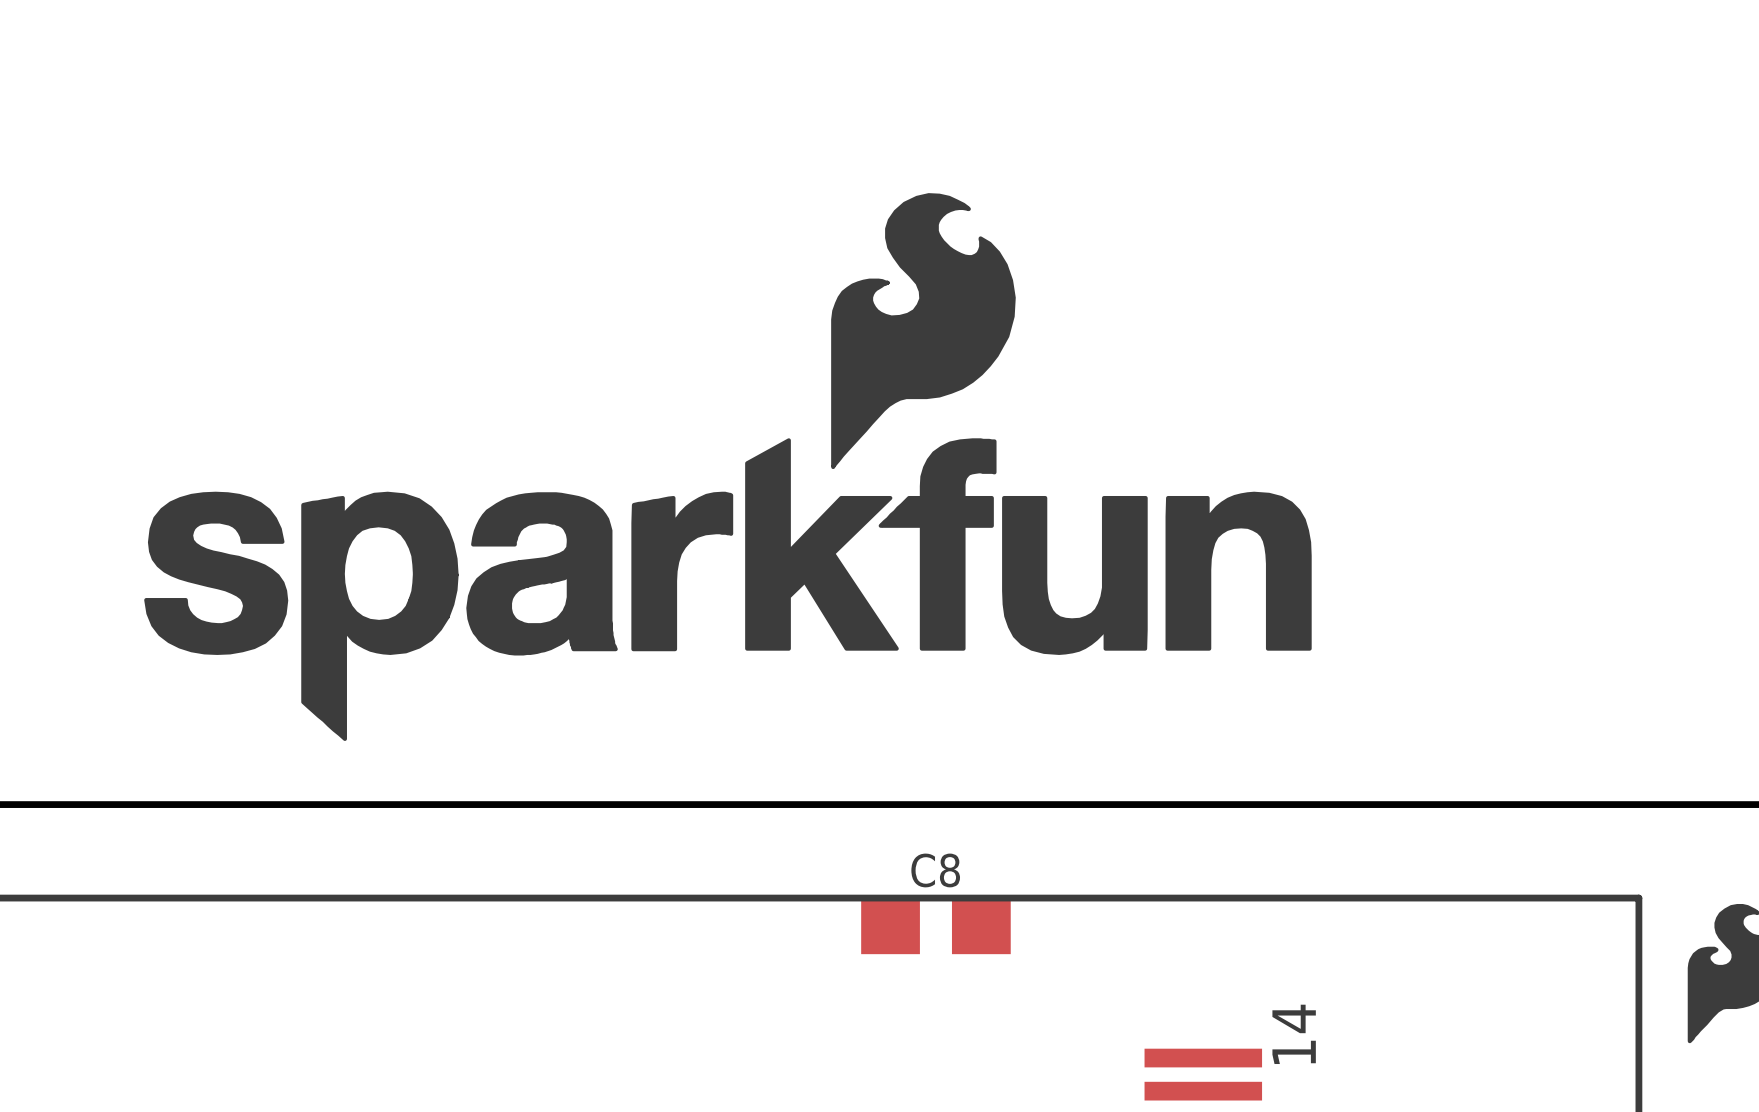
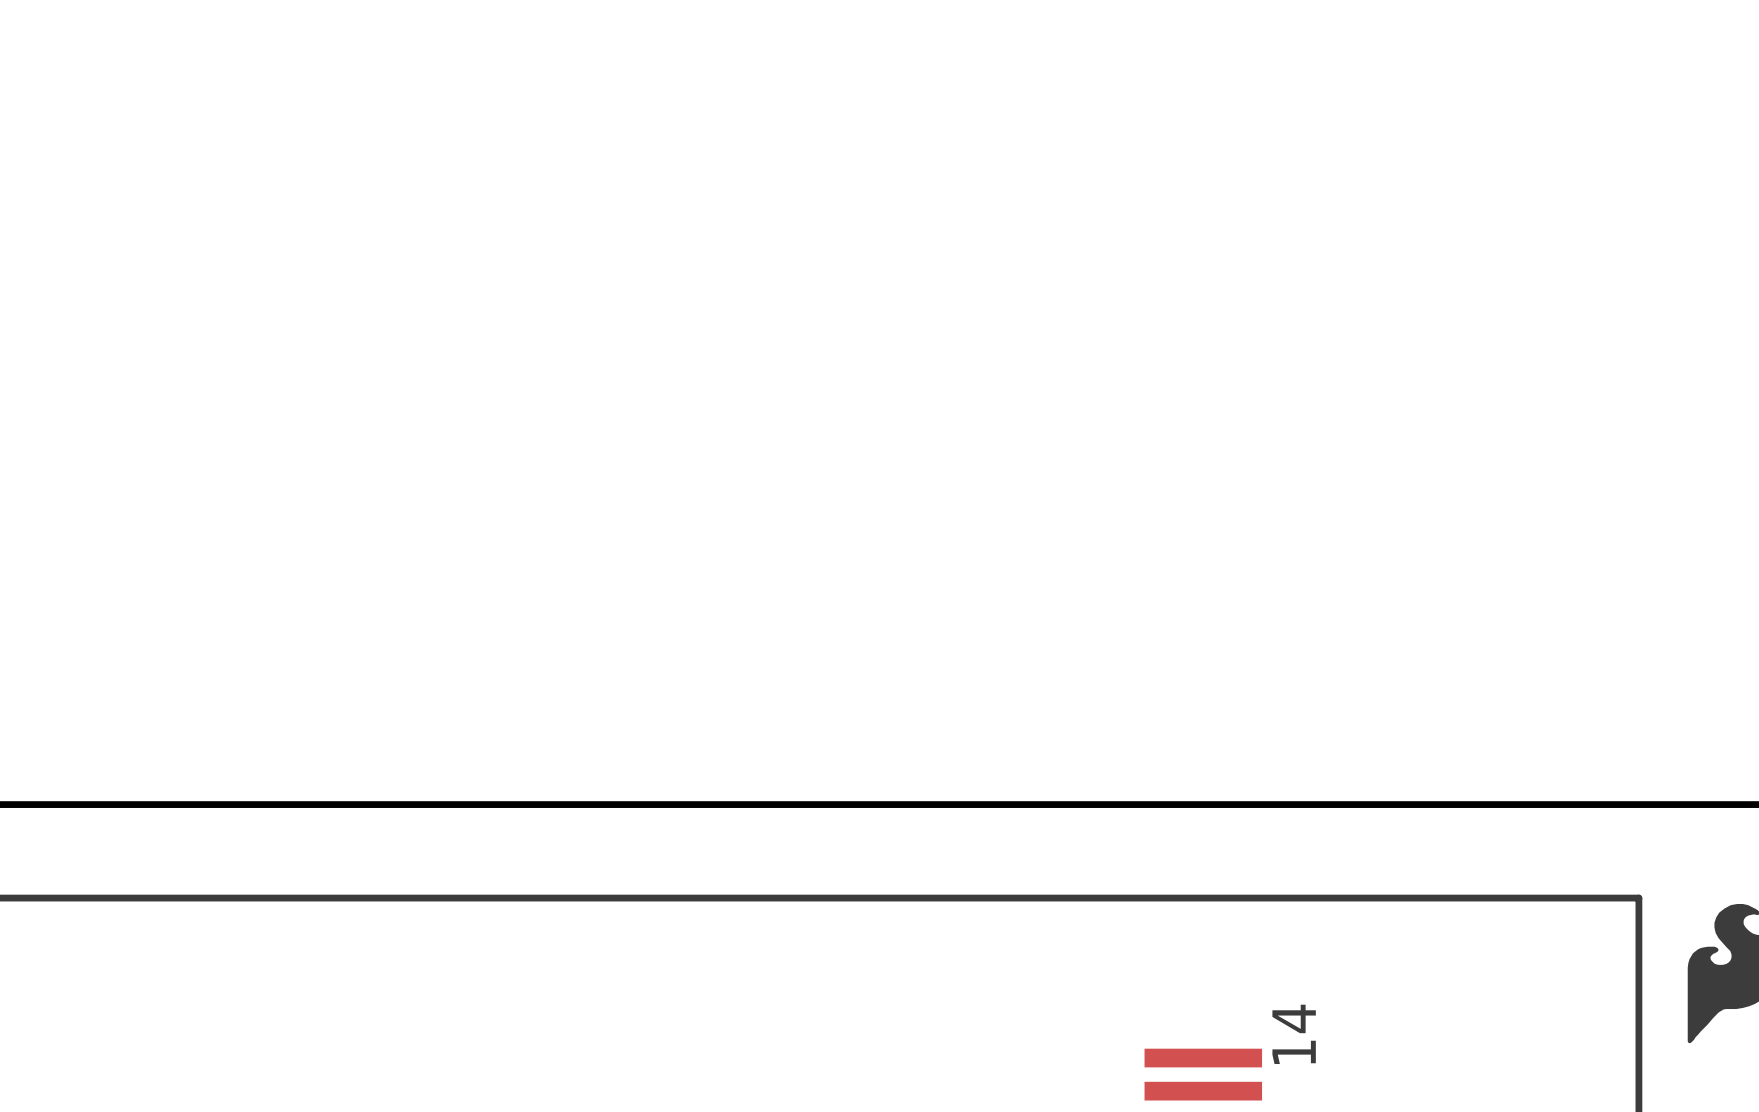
drawing: [144, 193, 1312, 741] -> none
C8: (935, 927) -> none

